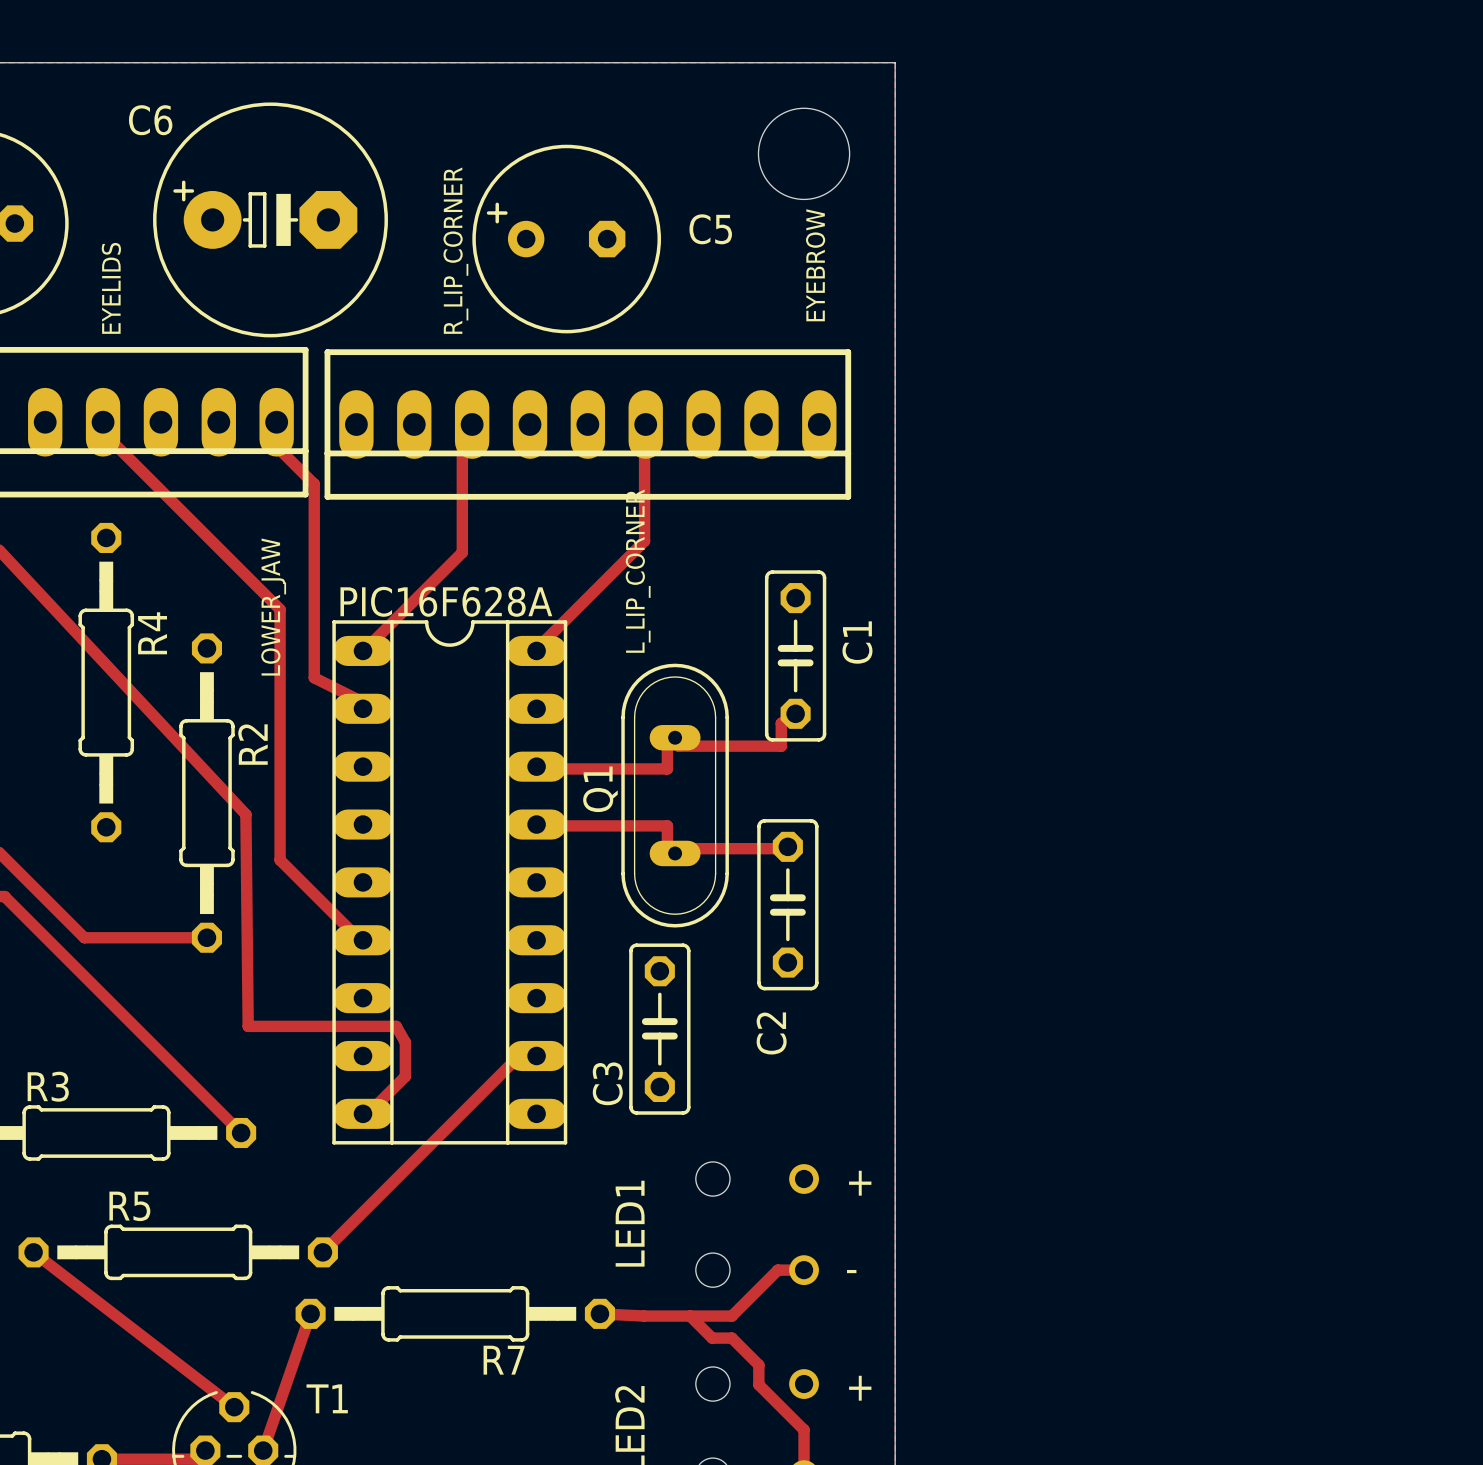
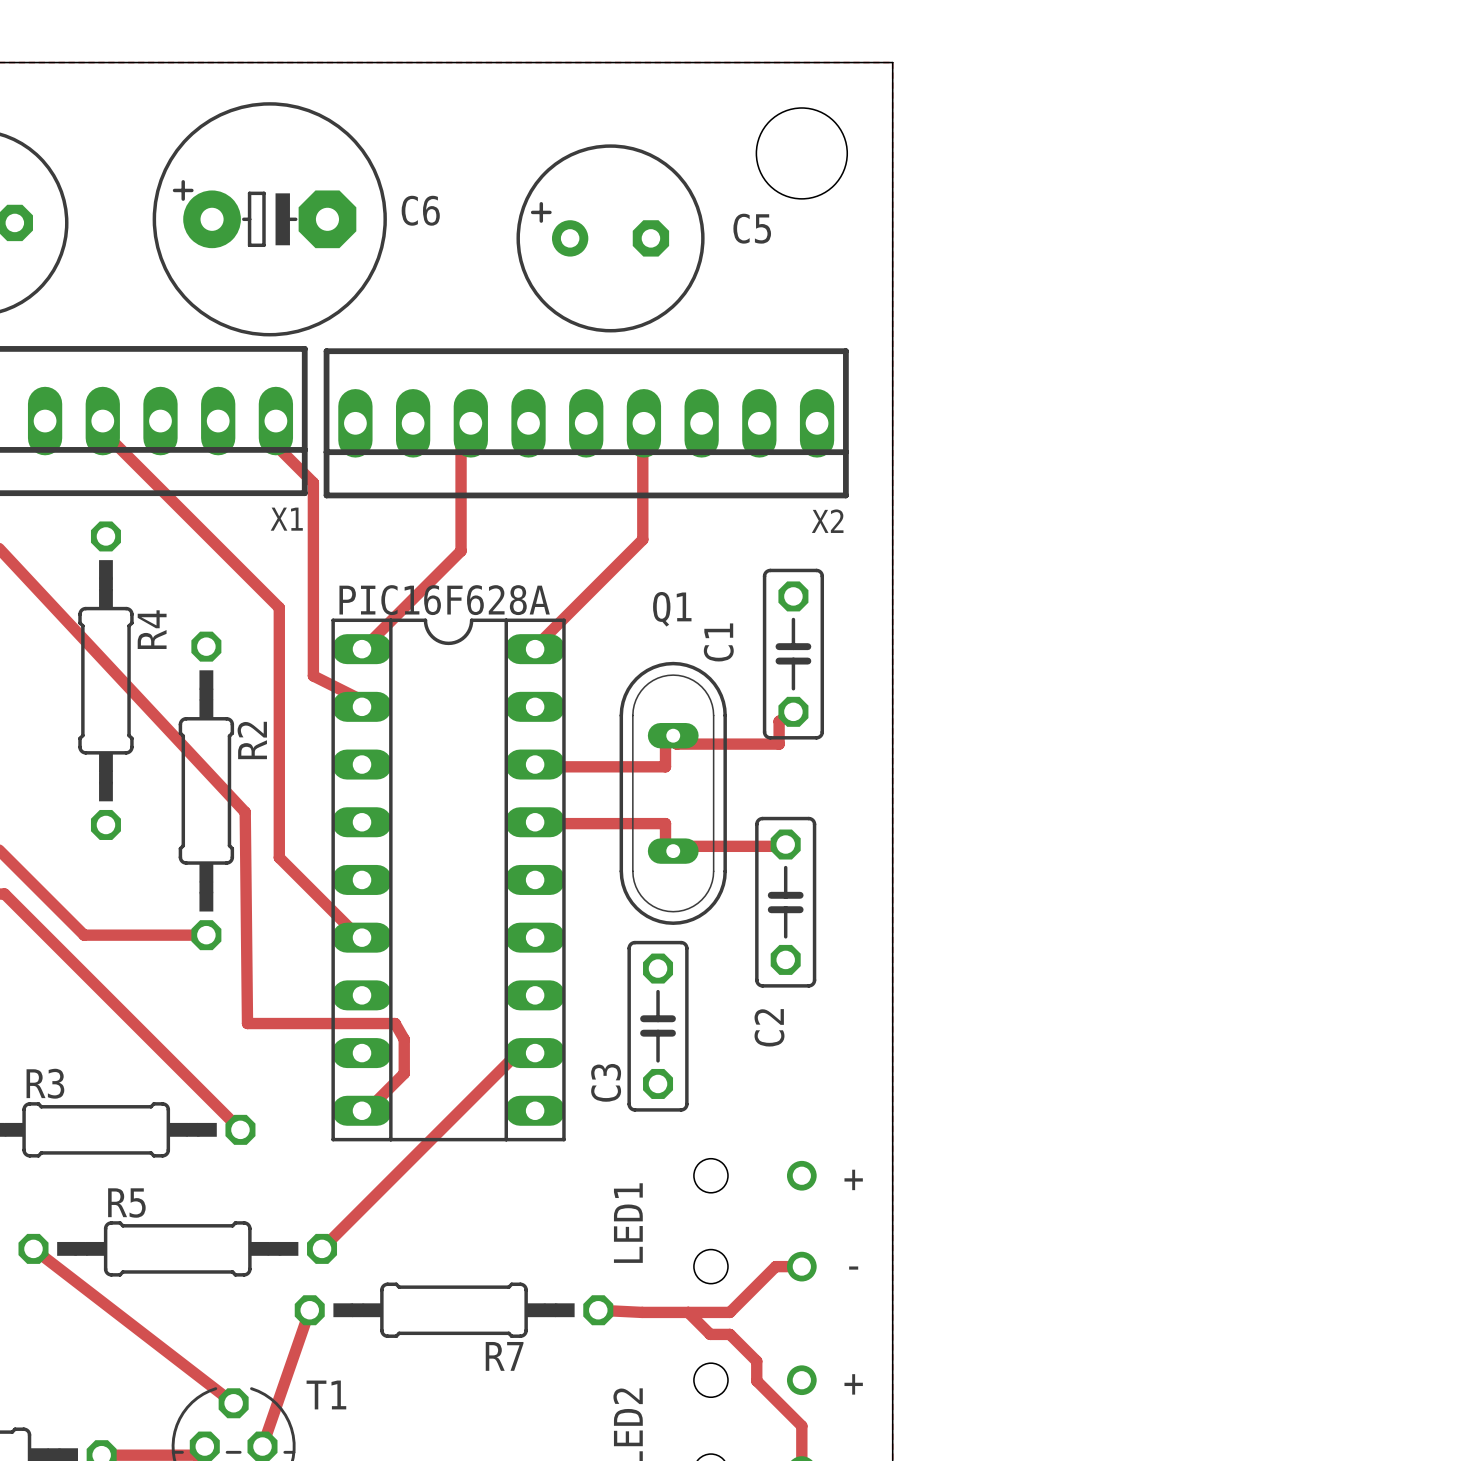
C6 name position: C6 (150, 120) -> C6 (420, 210)
C5 position: (566, 239) -> (610, 238)
text: R_LIP_CORNER (455, 250) -> none
text: EYEBROW (815, 265) -> none
text: EYELIDS (111, 288) -> none
X1 name: none -> X1 (286, 519)
X2 name: none -> X2 (827, 521)
text: L_LIP_CORNER (638, 571) -> none
text: LOWER_JAW (273, 607) -> none
C1 name position: C1 (857, 642) -> C1 (718, 642)
Q1 name rotation: 0° (600, 789) -> 90° clockwise (672, 609)
Q1 name position: Q1 (600, 789) -> Q1 (672, 609)

